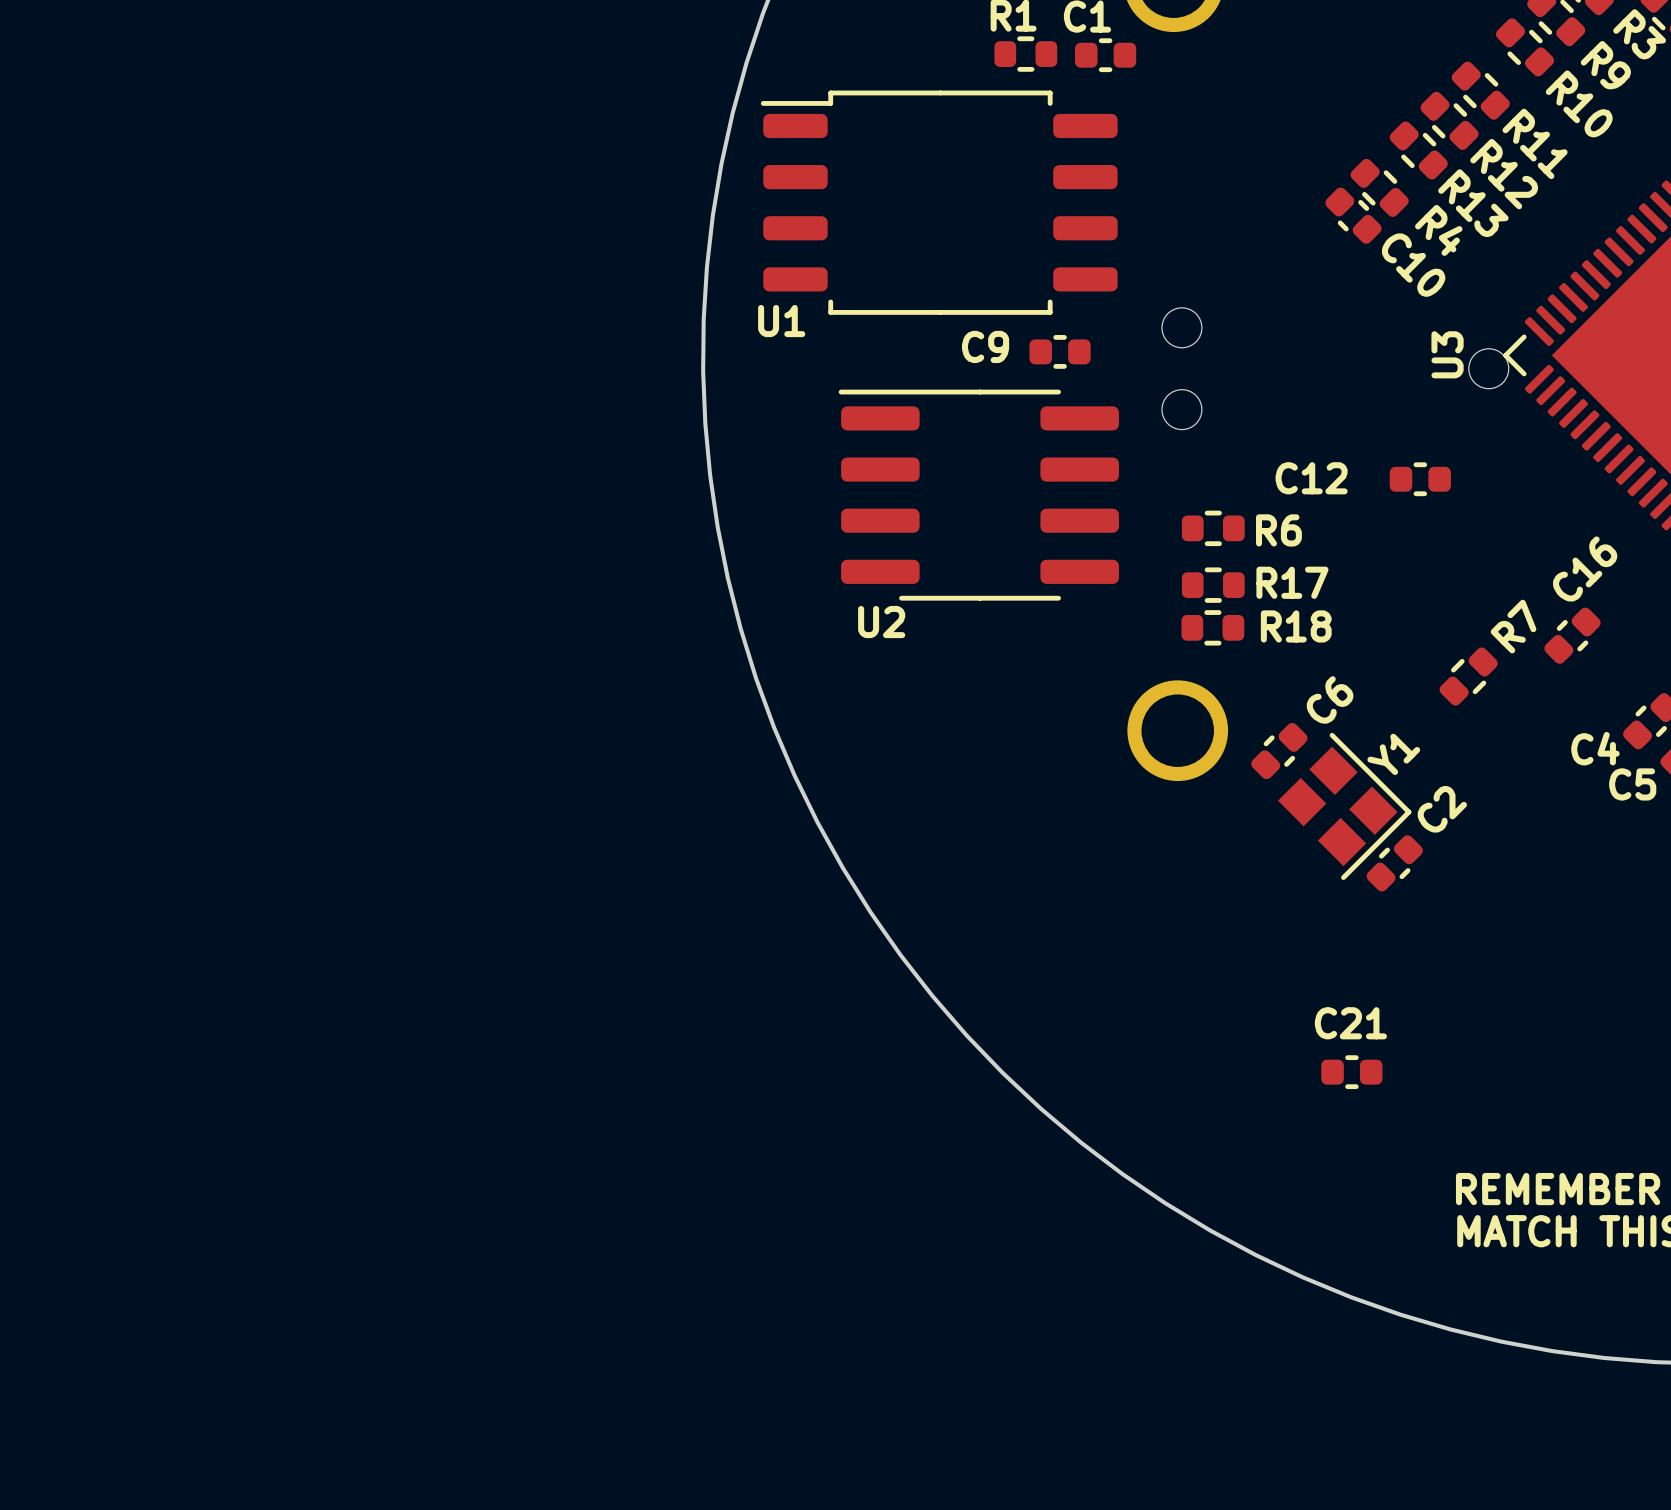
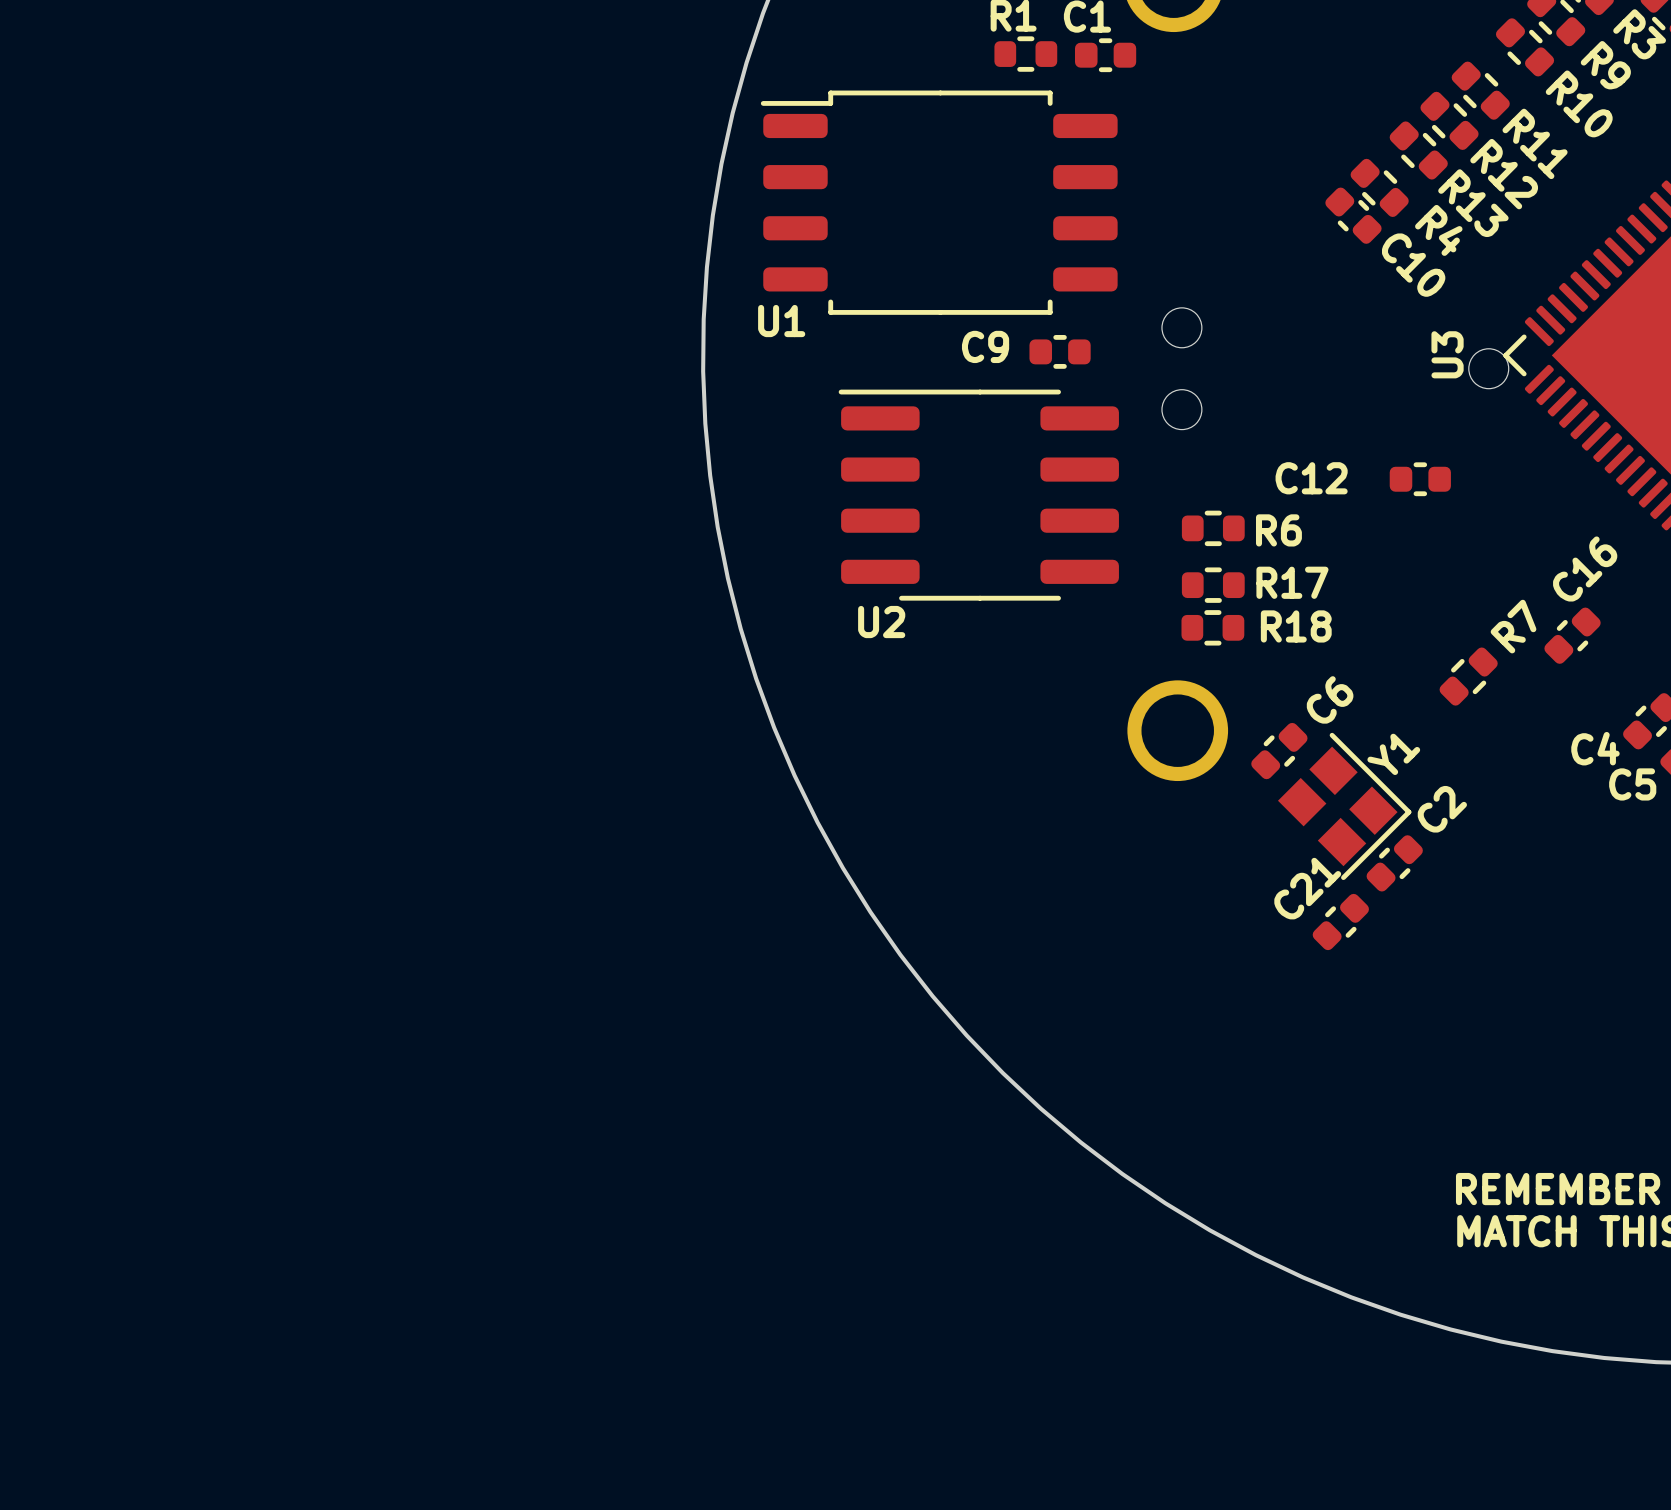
C21 rotation: 0° (1351, 1072) -> 45° counterclockwise (1340, 922)
C21 position: (1351, 1072) -> (1340, 922)

